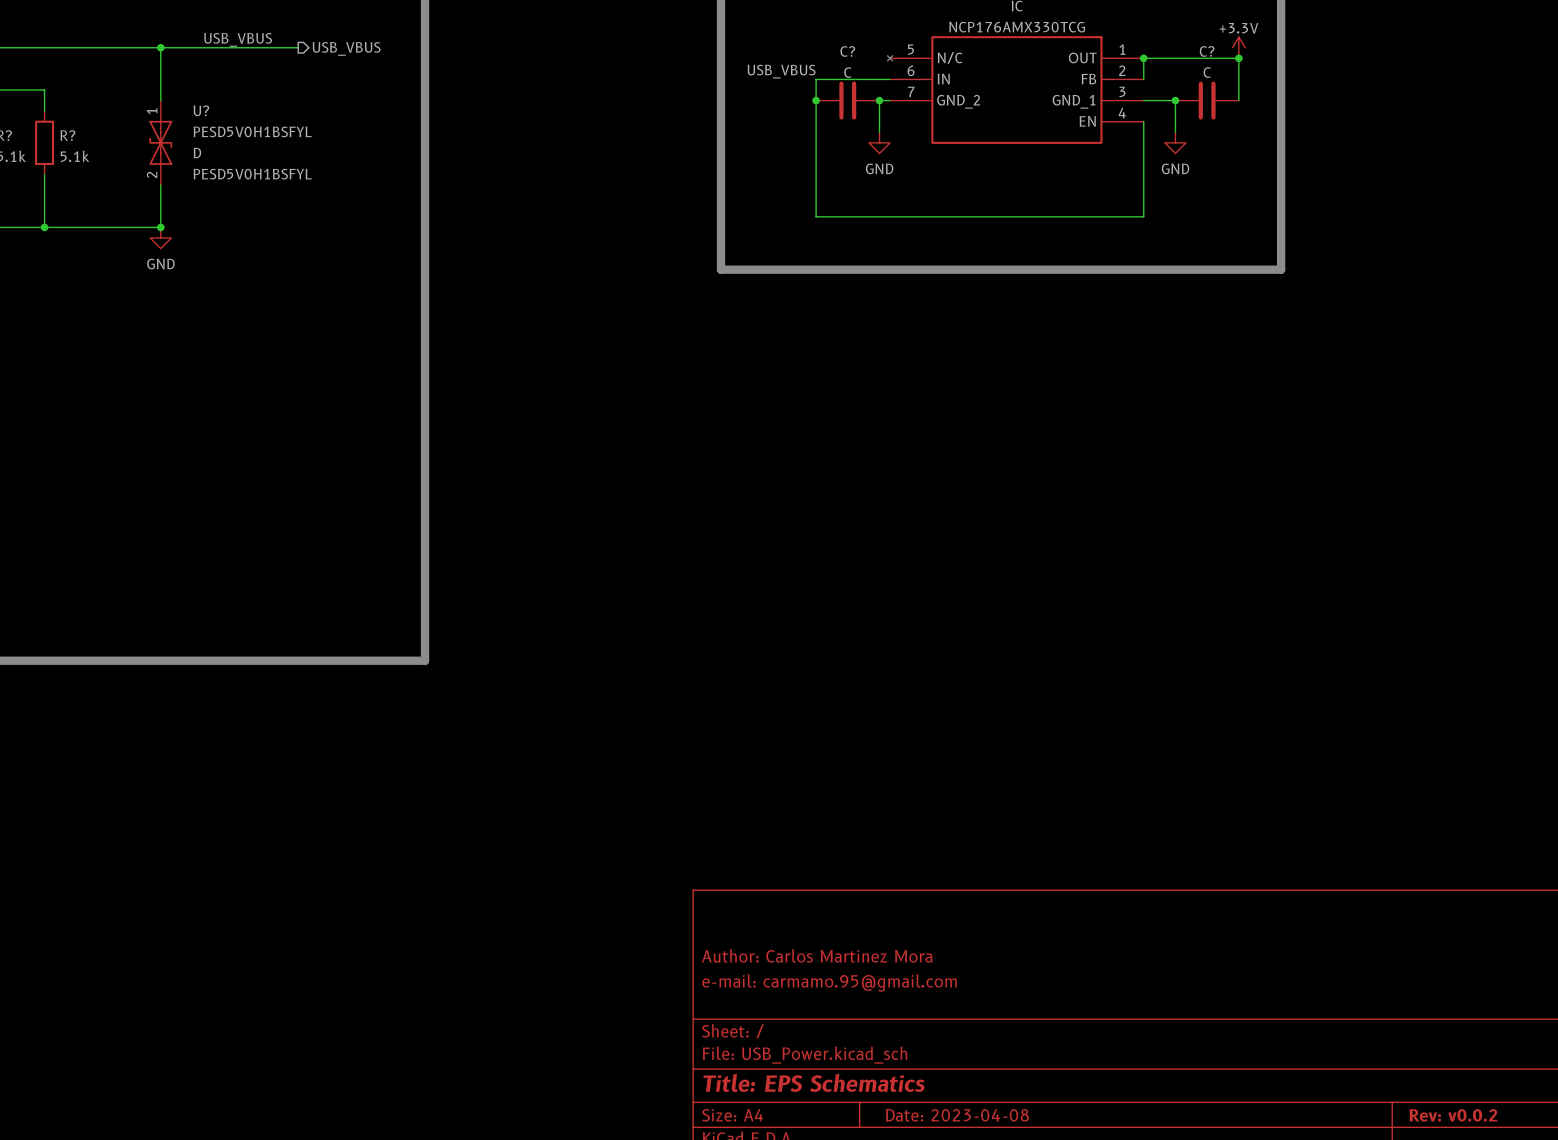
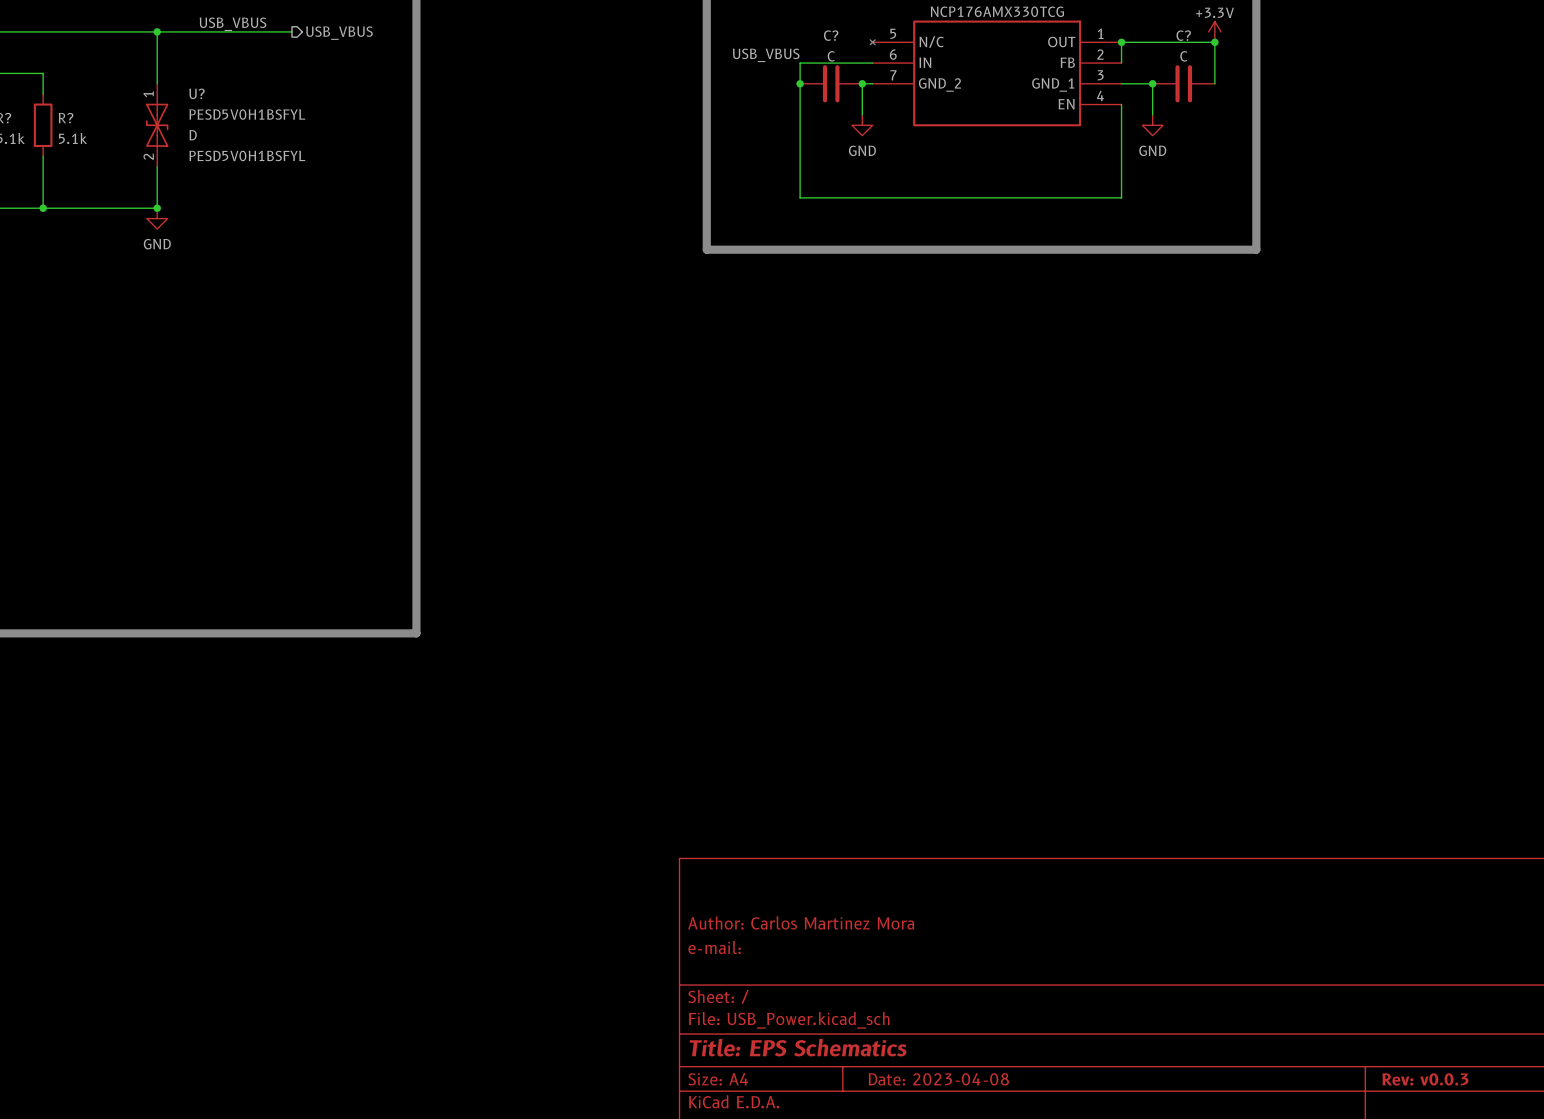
title block: e-mail: carmamo.95@gmail.com (829, 982) -> e-mail: (714, 947)
title block: Rev: v0.0.2 (1453, 1115) -> Rev: v0.0.3 (1425, 1079)

